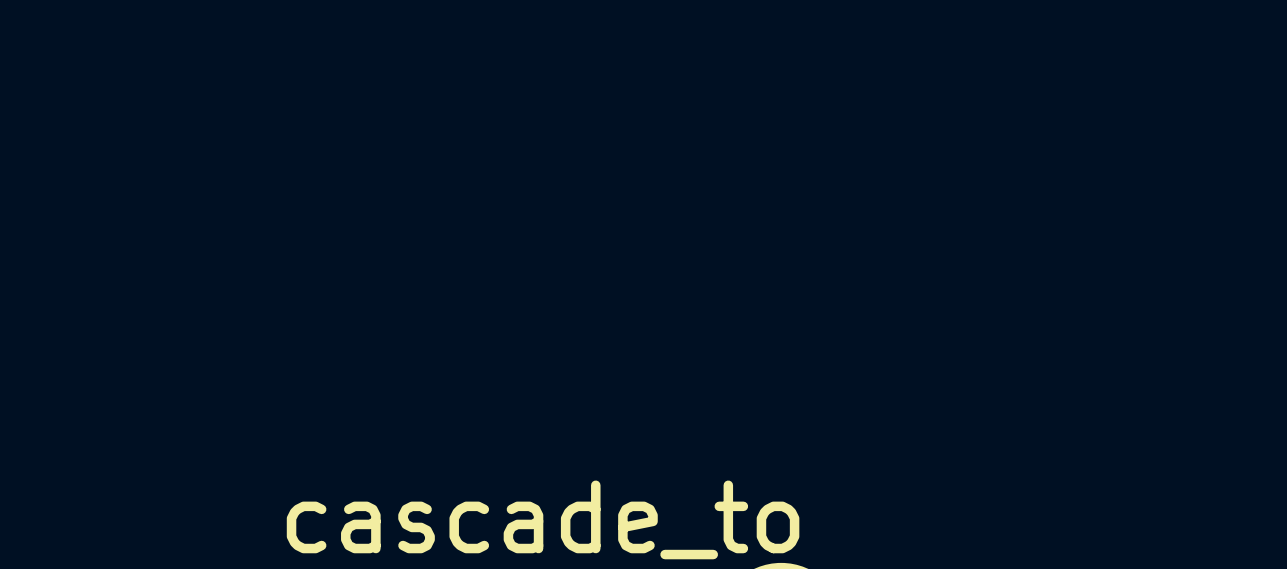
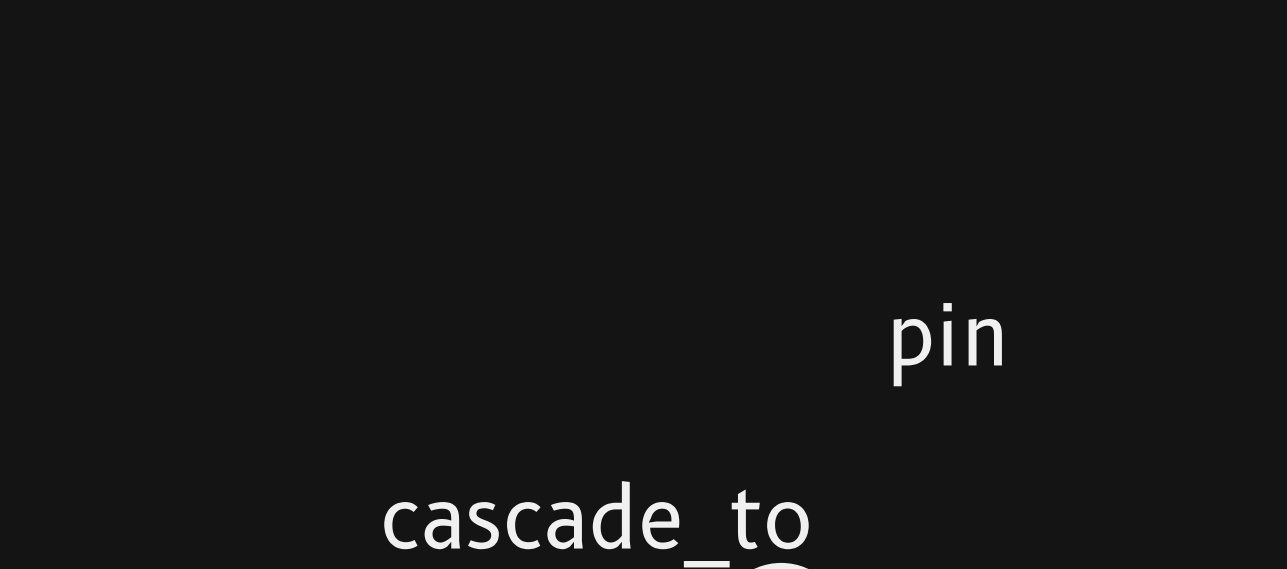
text: none -> pin (947, 344)

